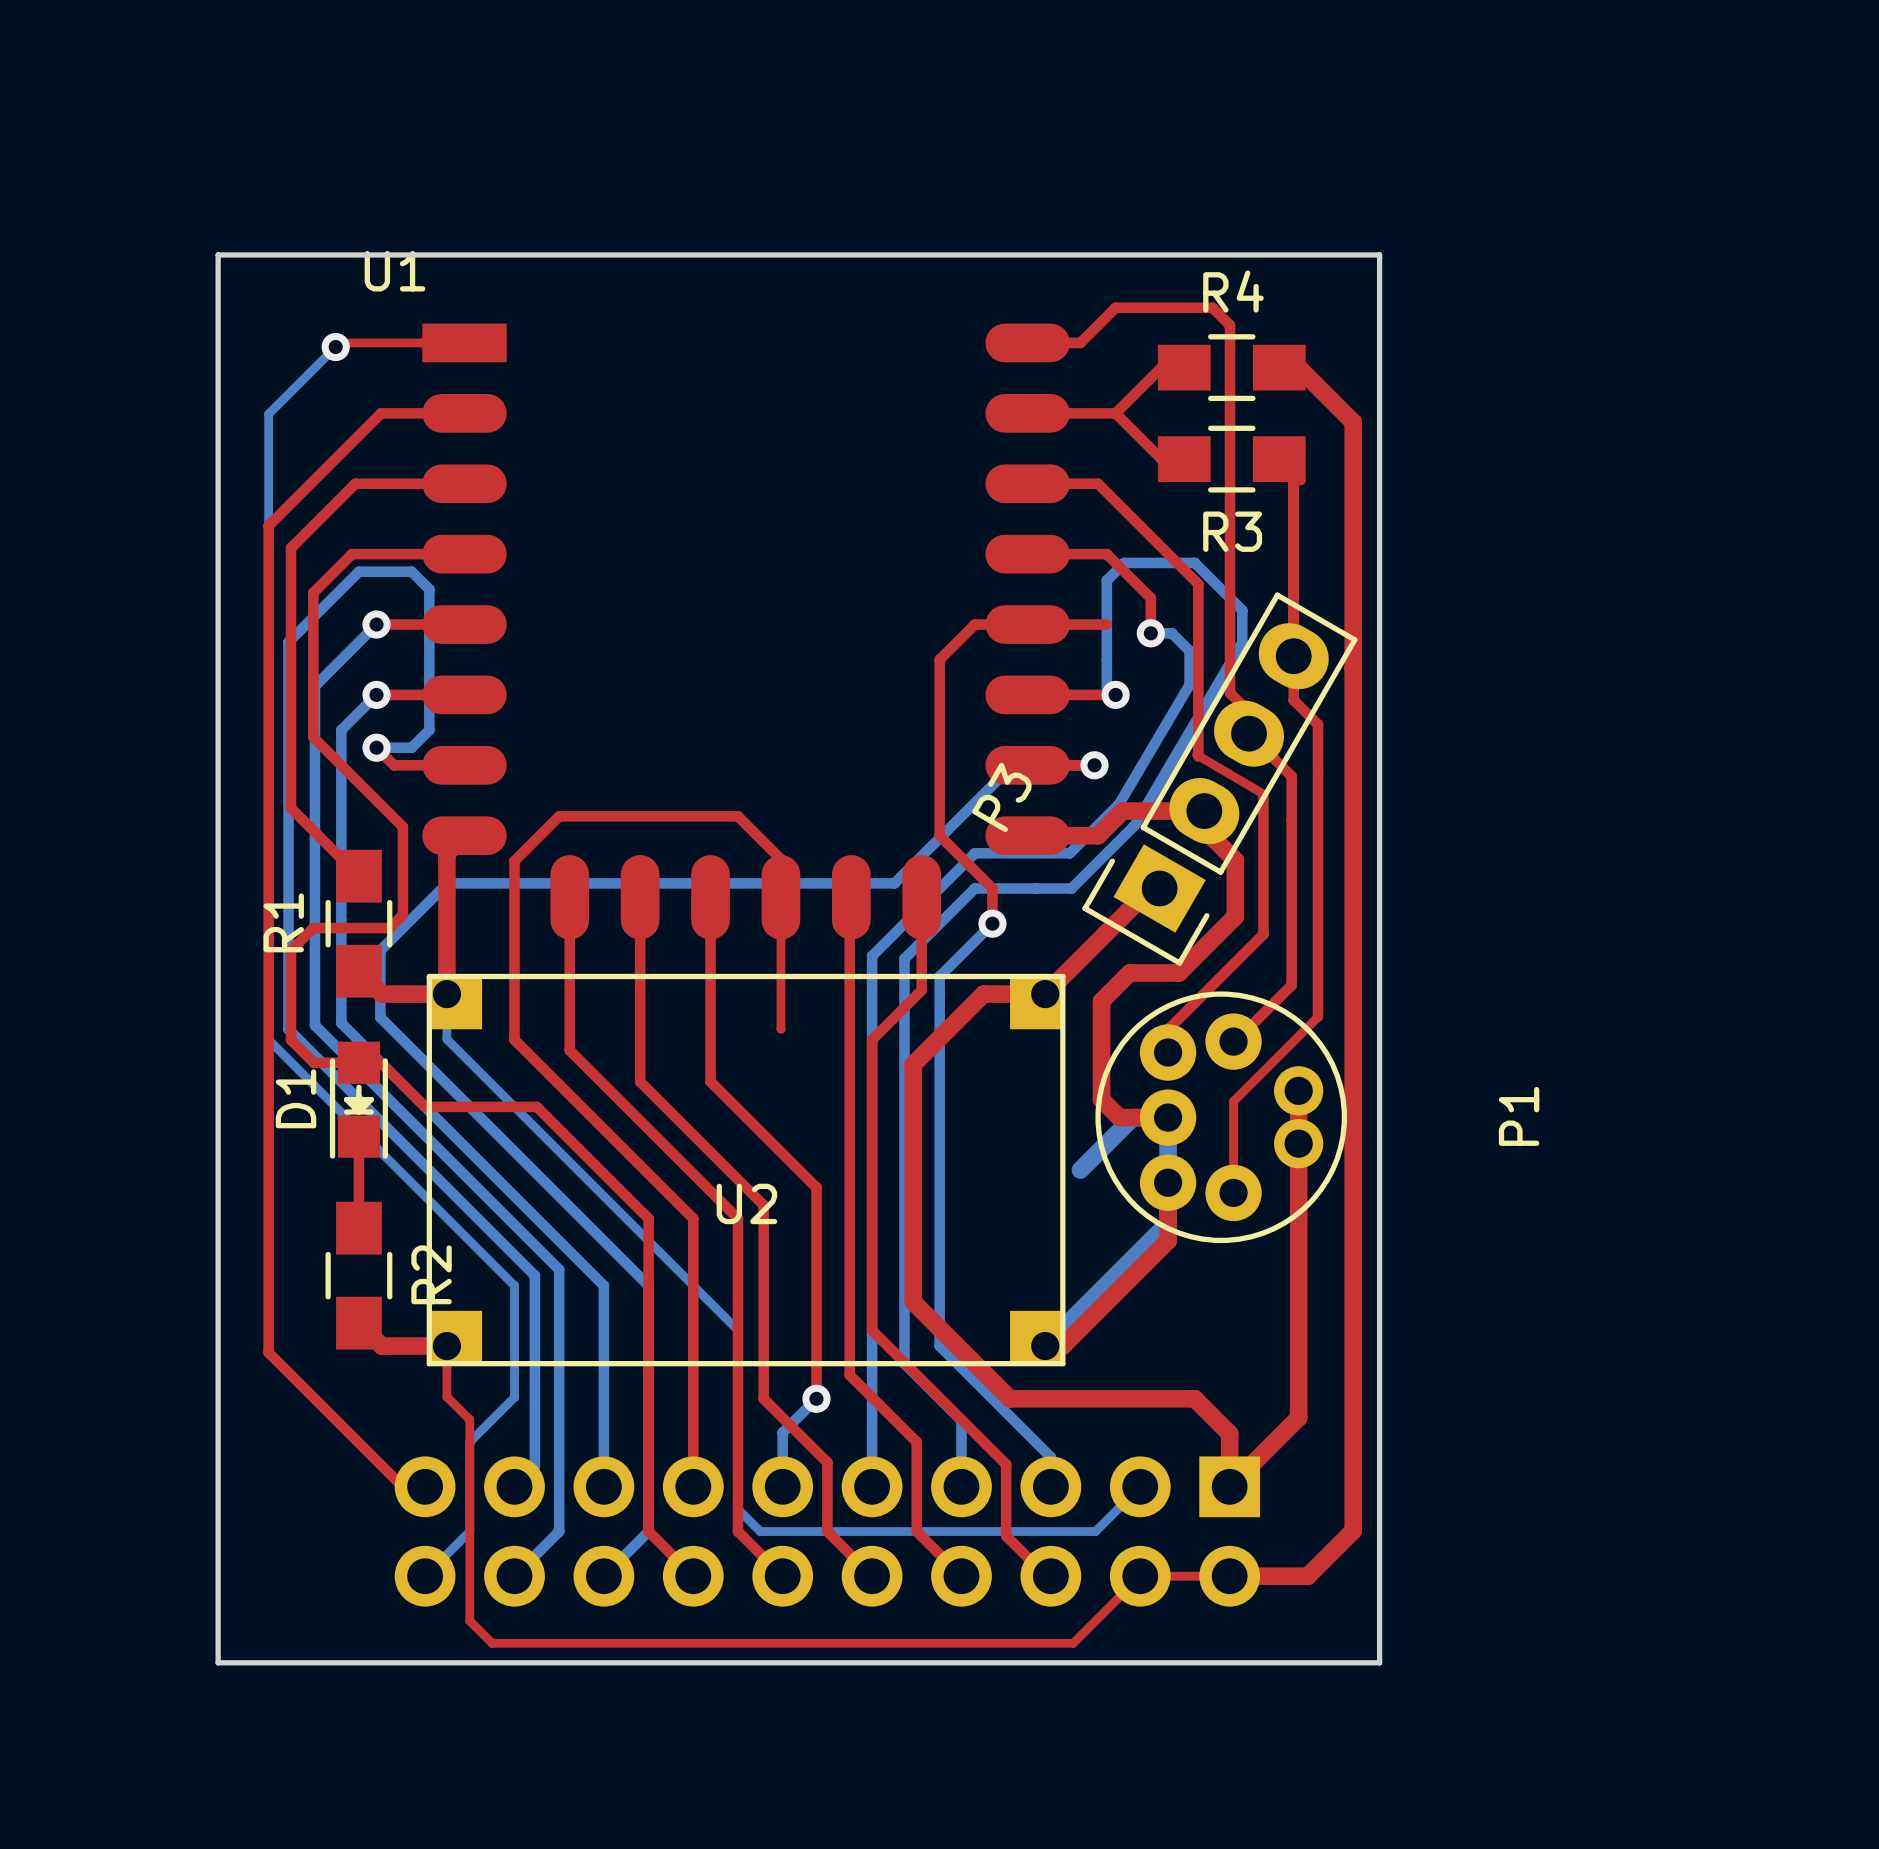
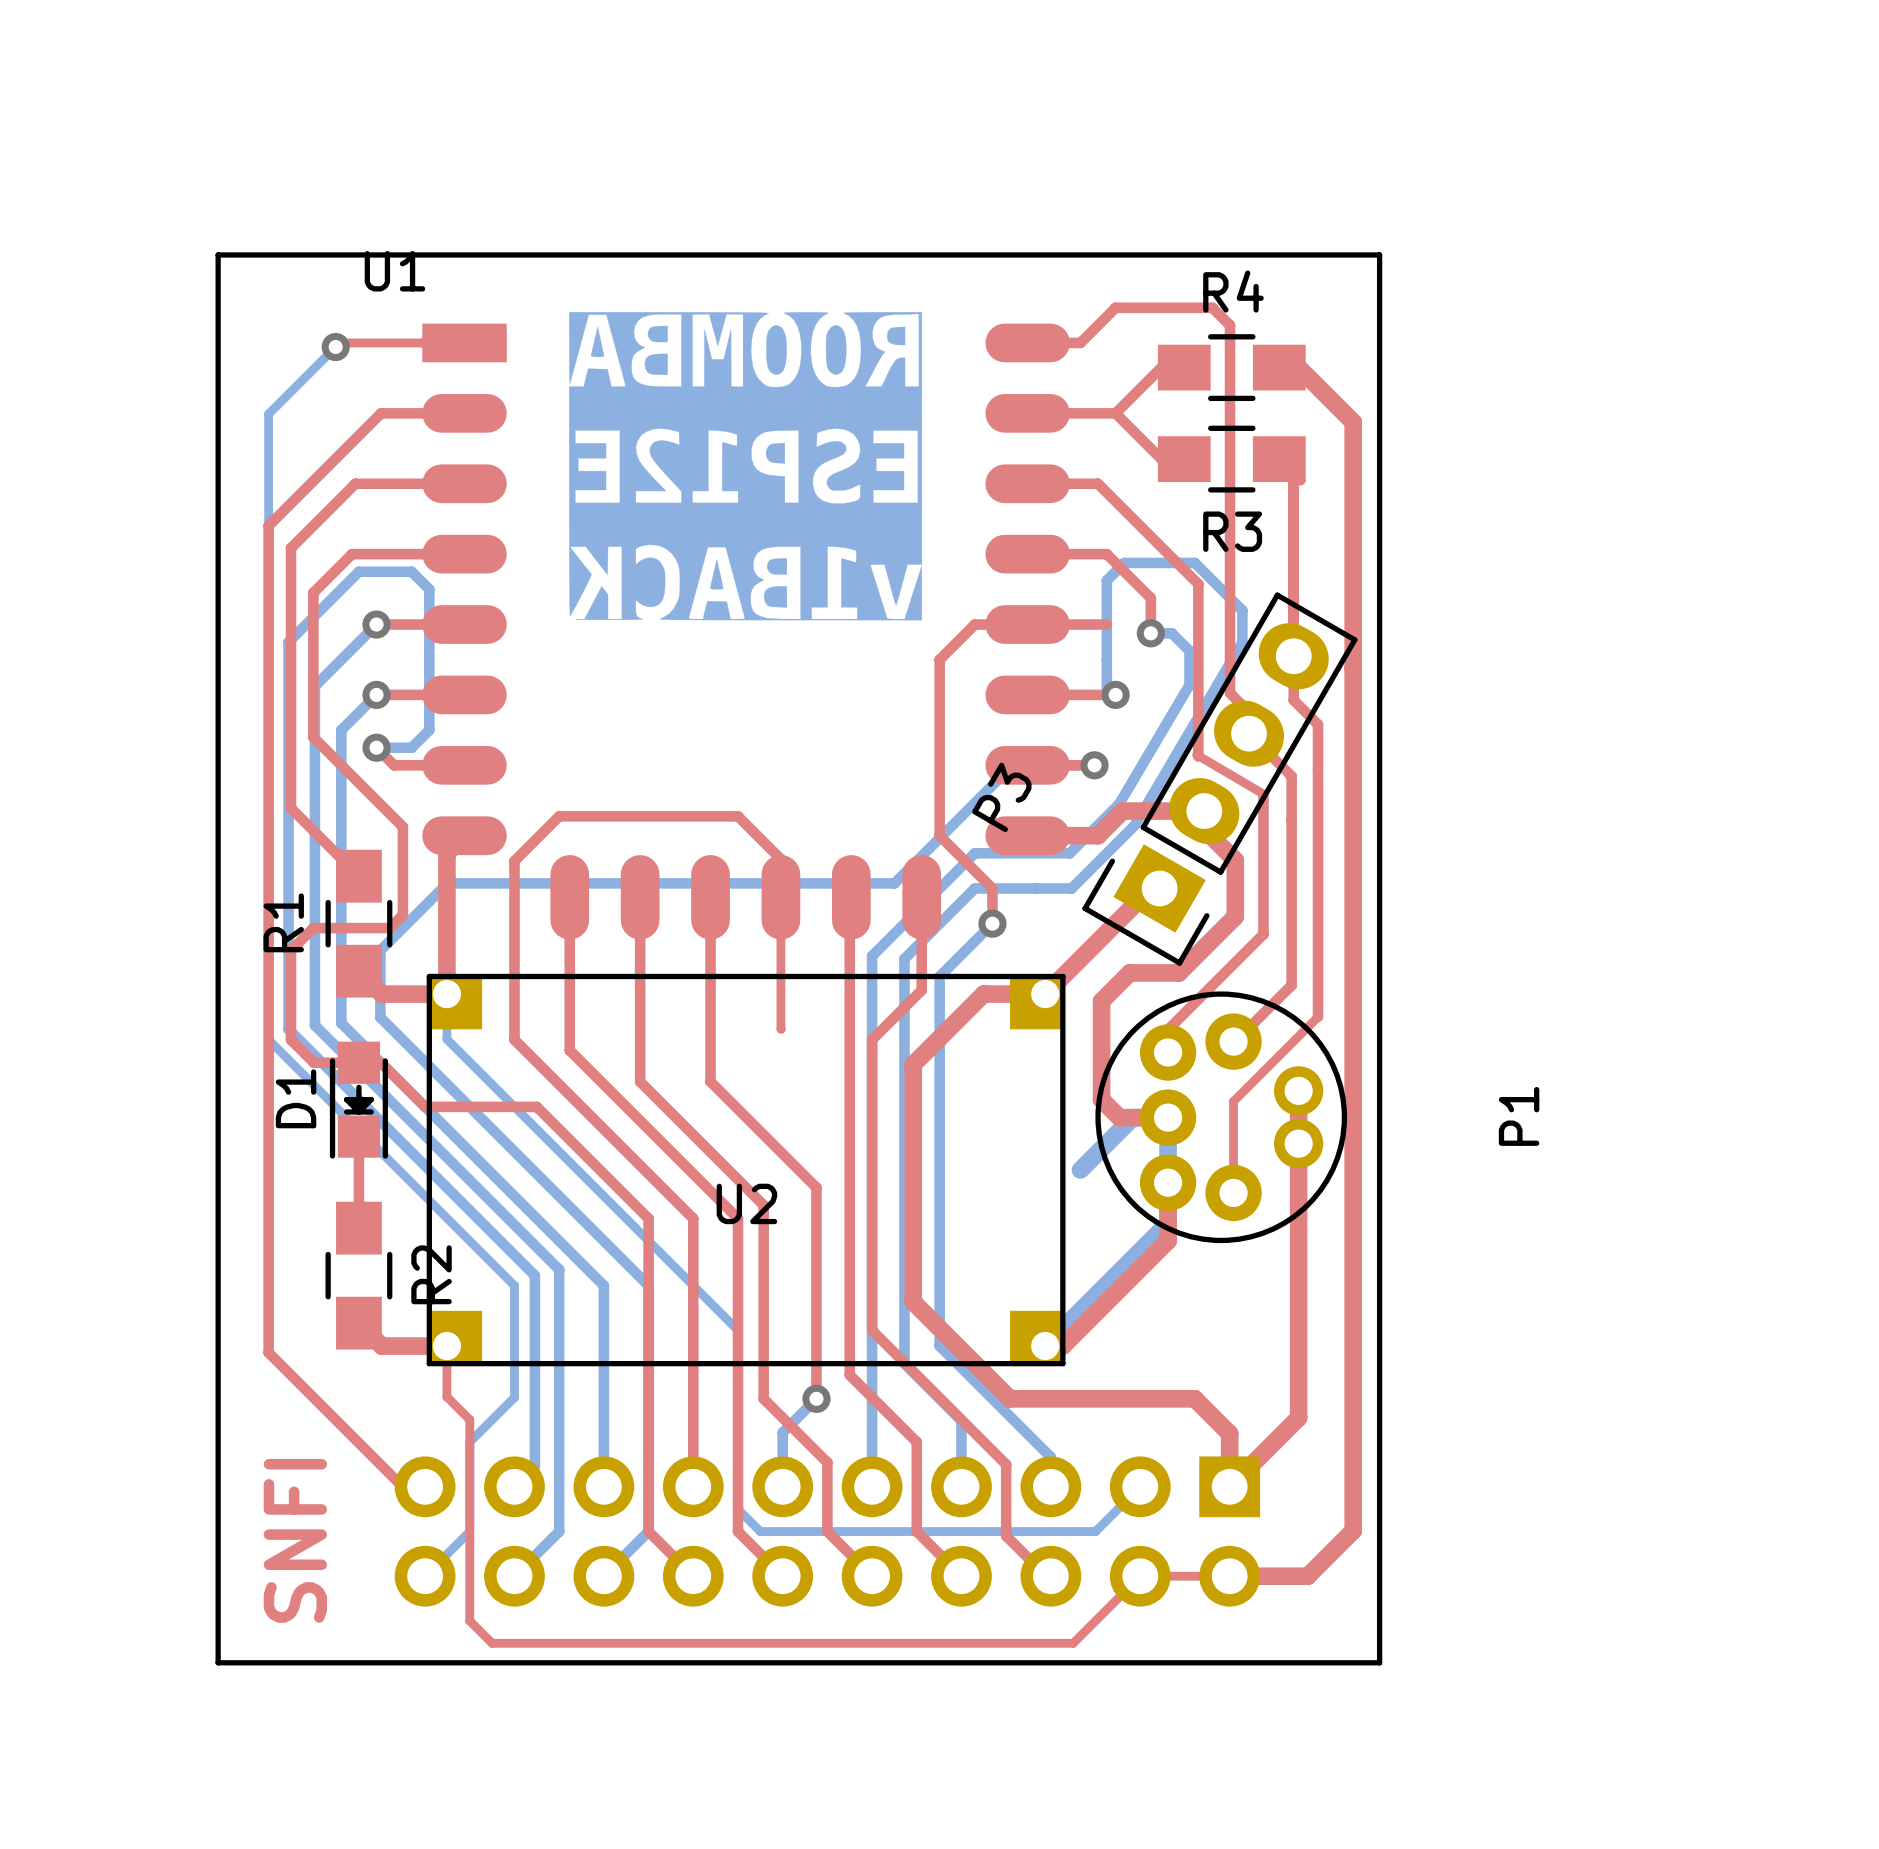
drawing: none -> [569, 312, 923, 621]
text: none -> SNFI (295, 1540)

